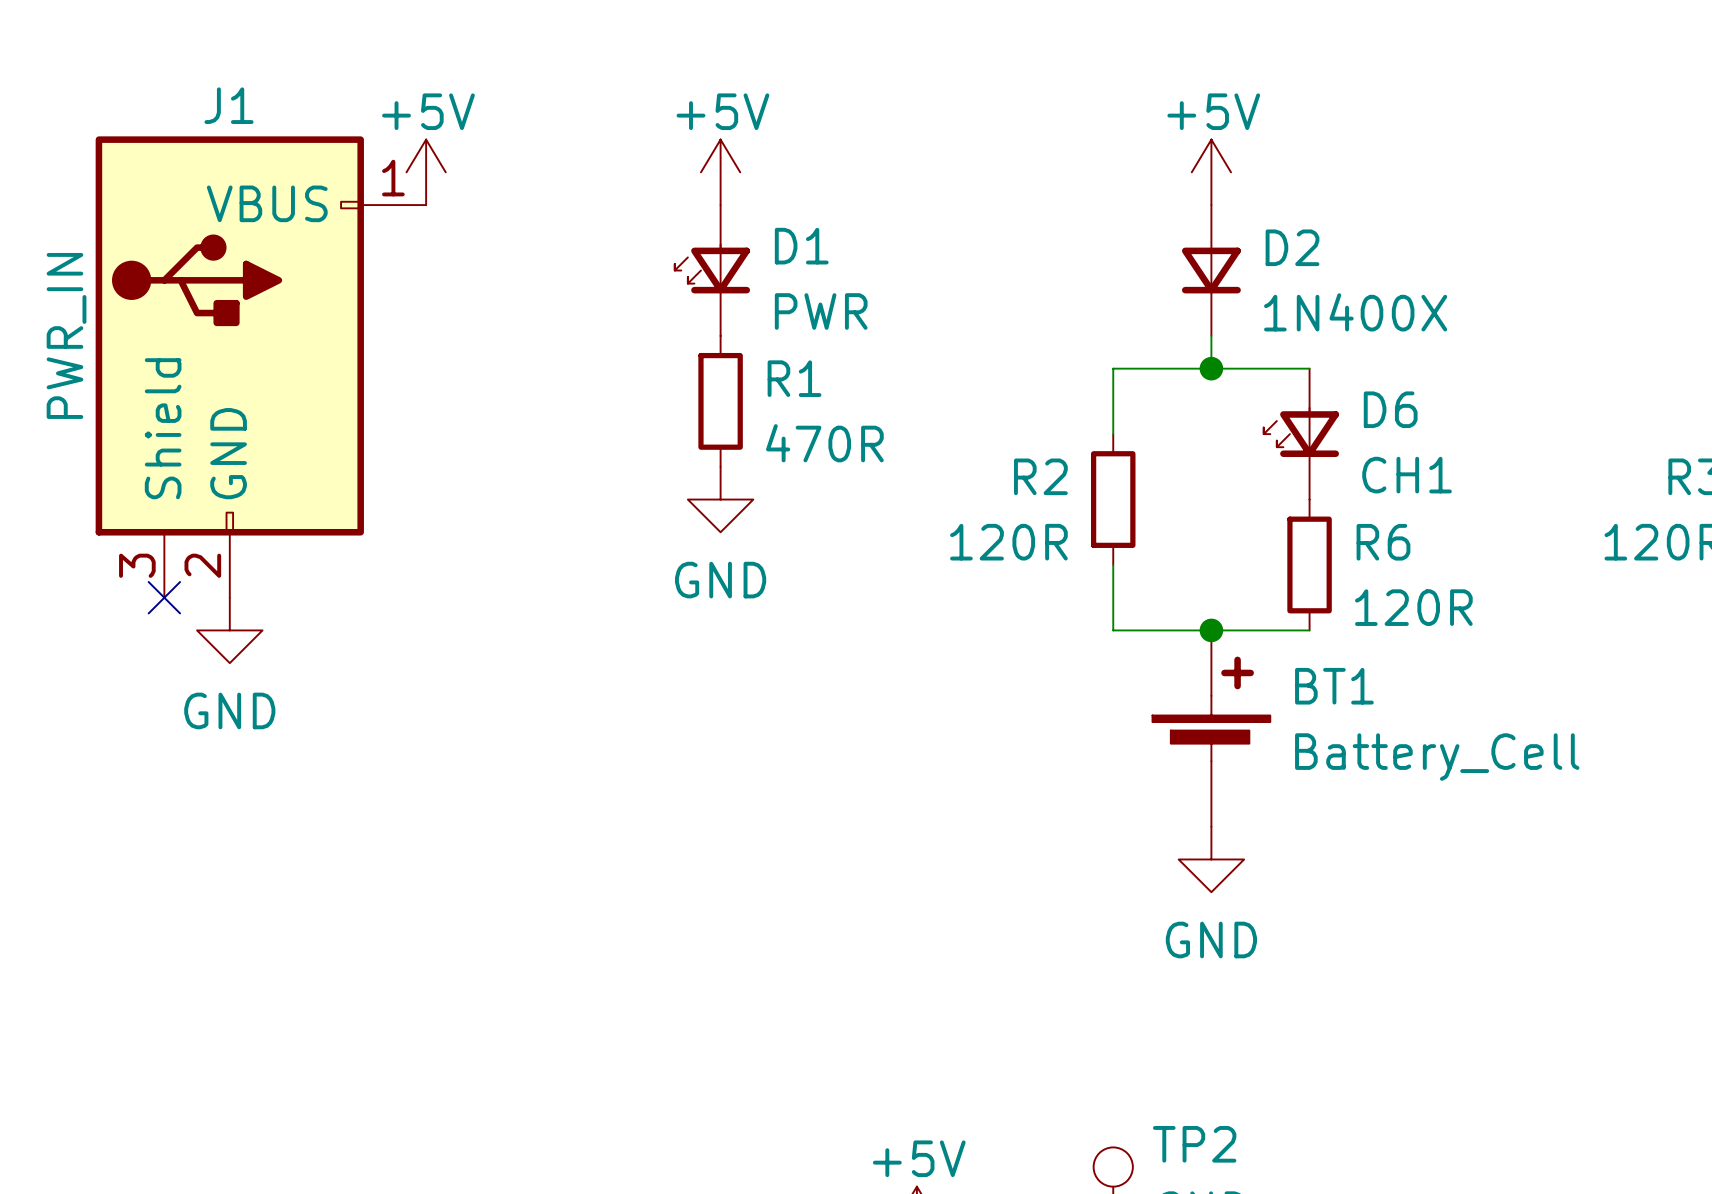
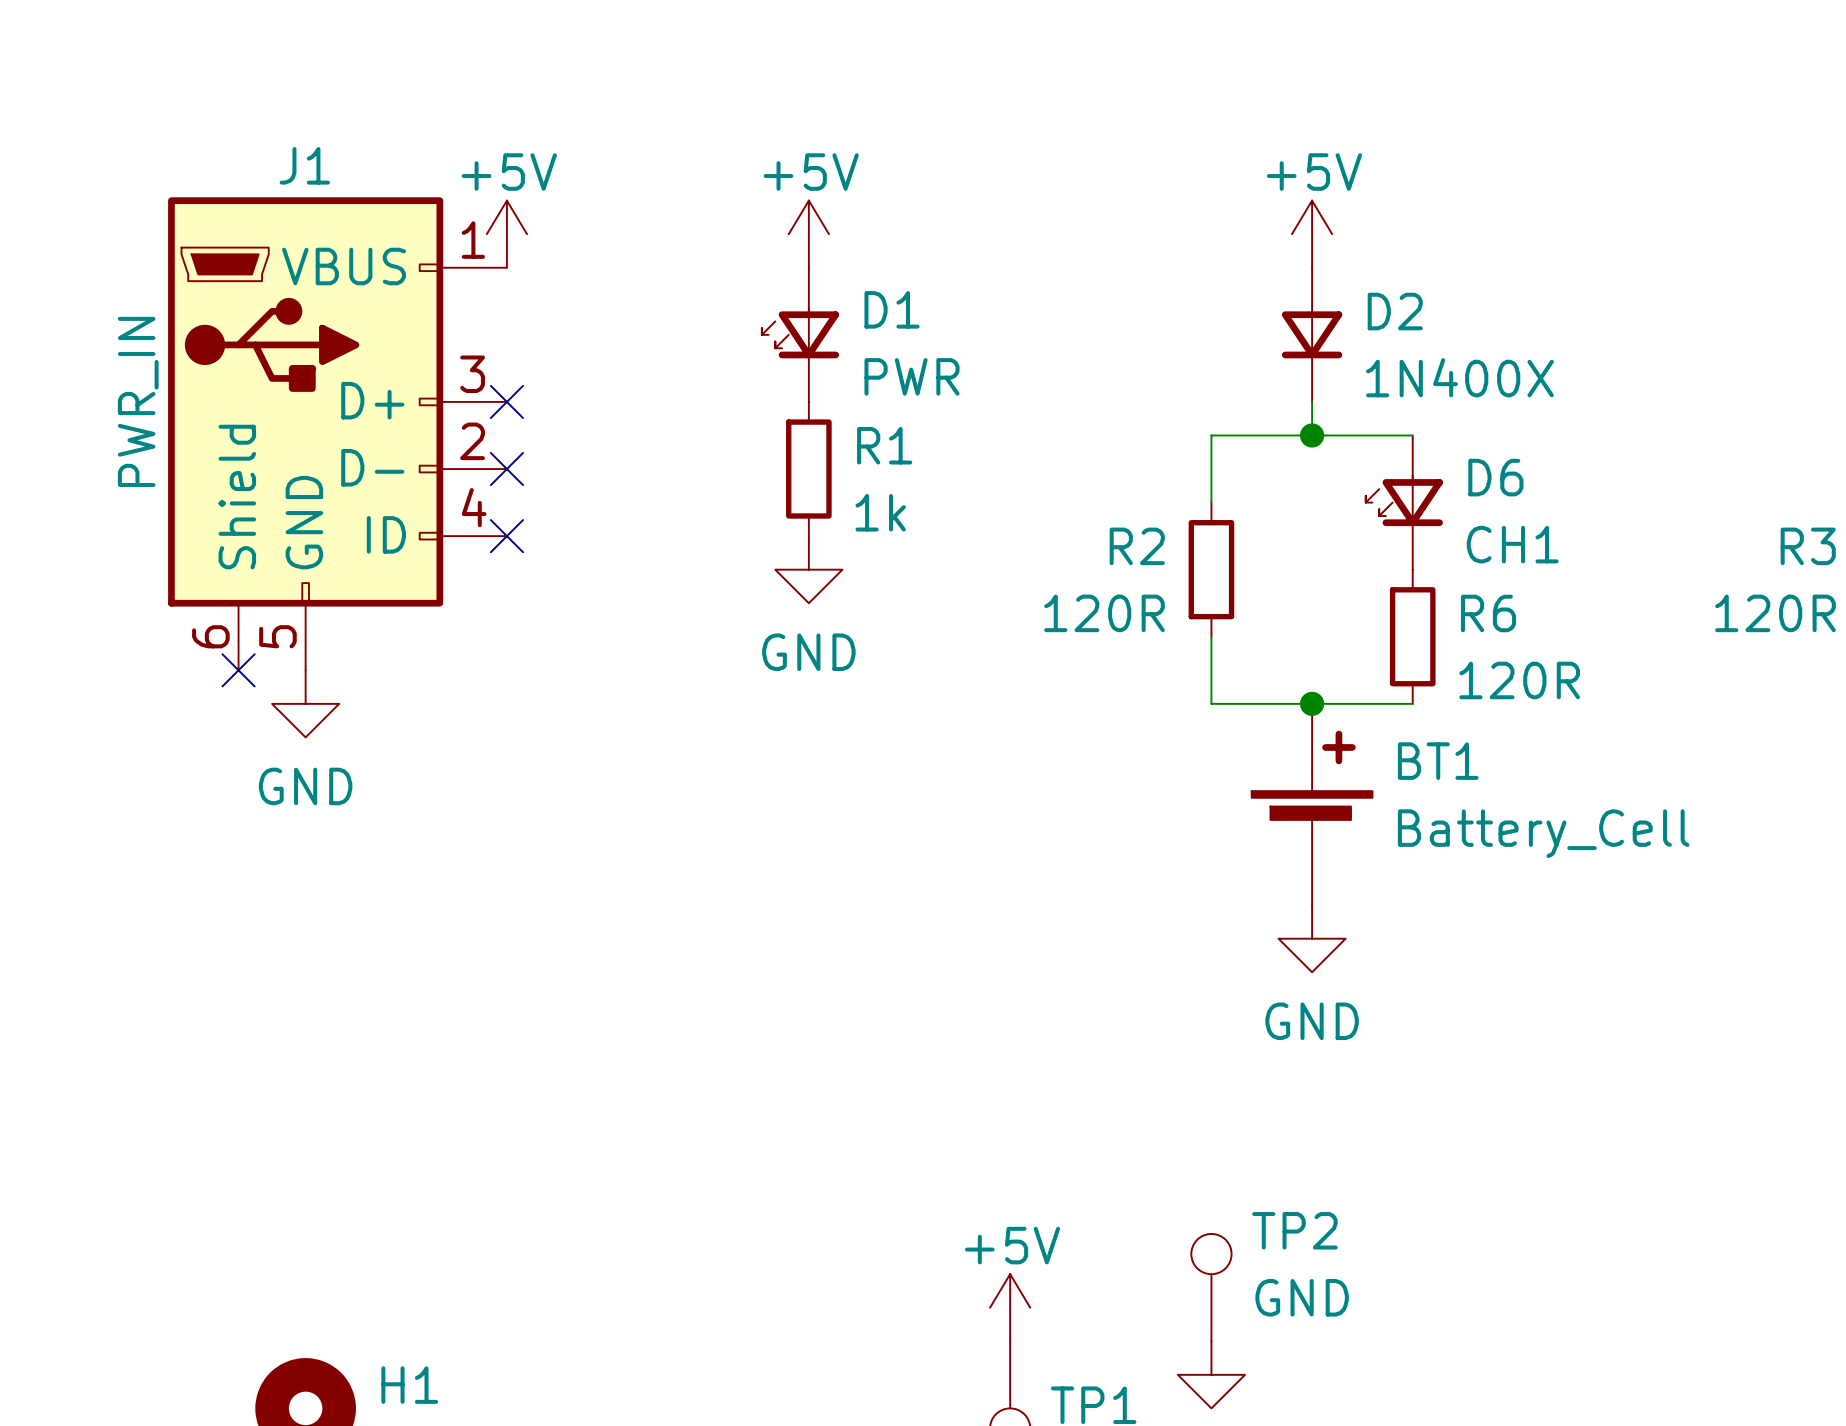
J1 symbol: [95, 136, 427, 598] -> [168, 197, 507, 671]
no-connect mark: none -> (506, 401)
no-connect mark: none -> (506, 469)
R1 value: 470R (824, 443) -> 1k (880, 512)
no-connect mark: none -> (506, 536)

